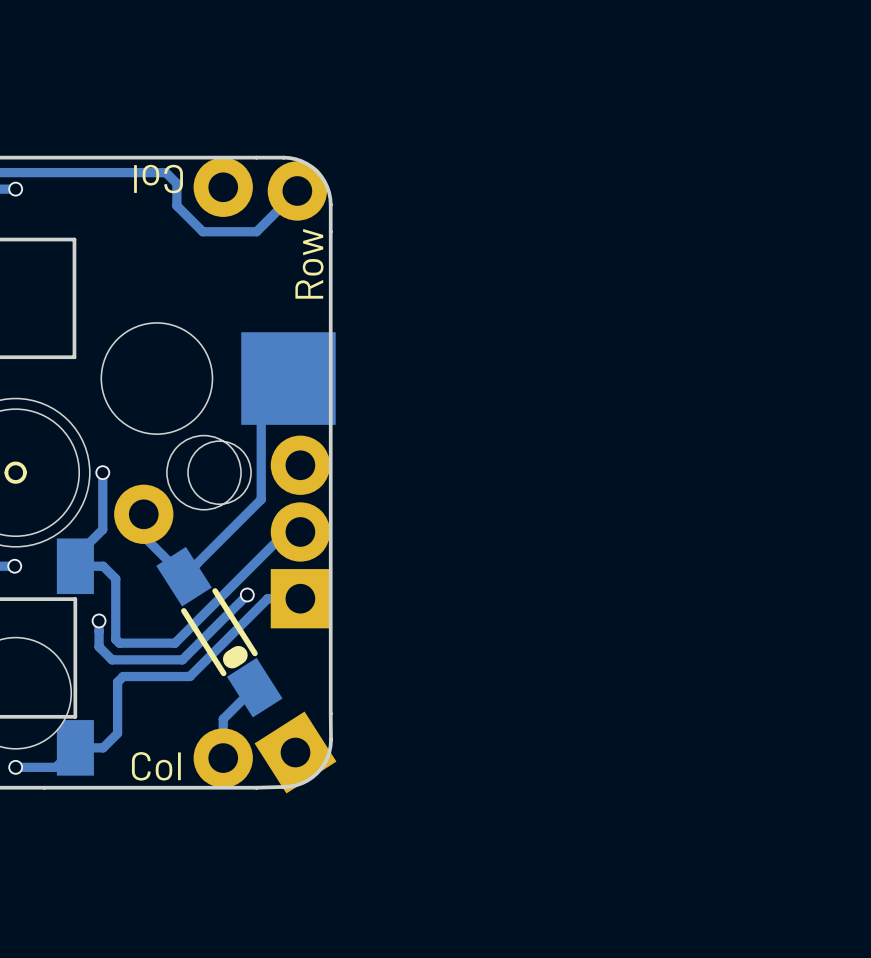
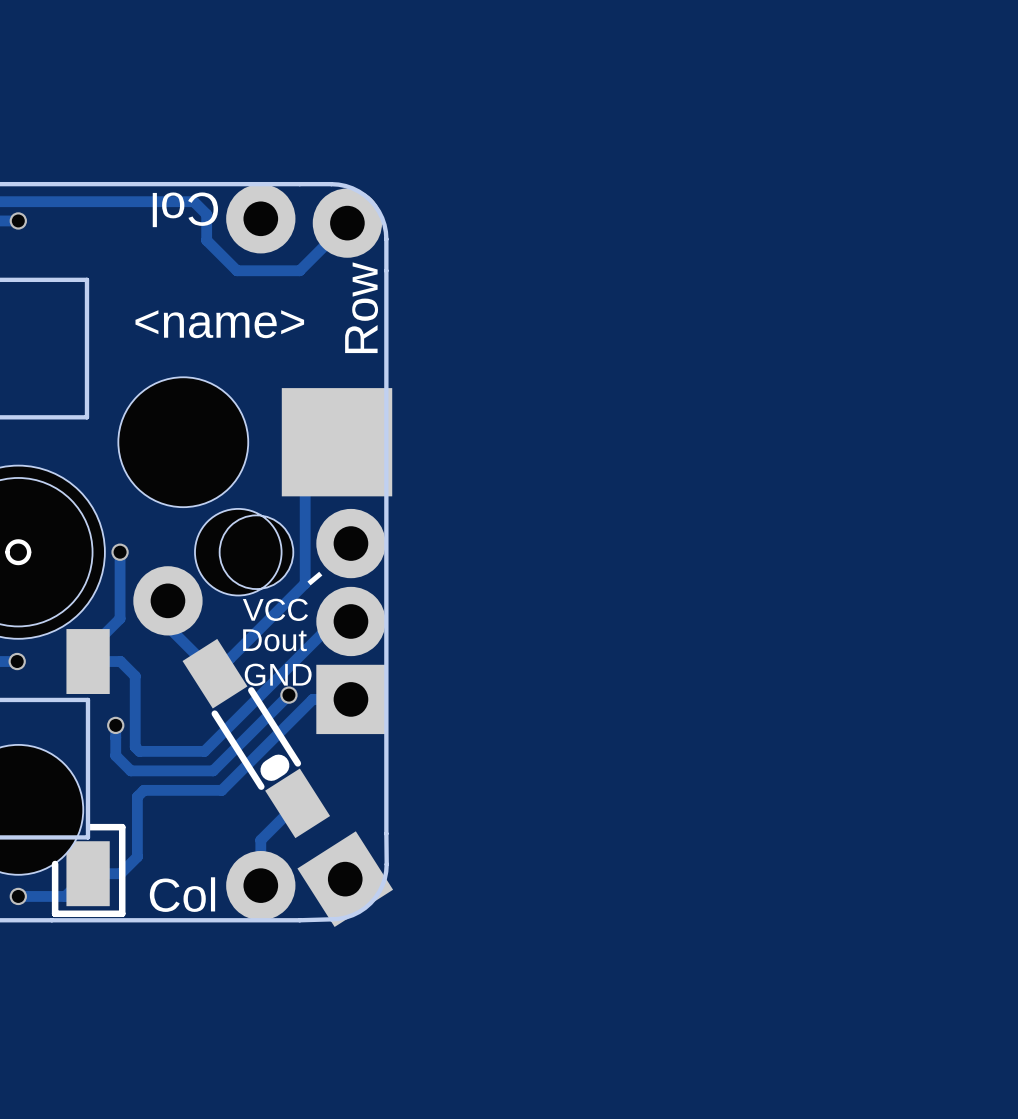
text: none -> <name> (219, 324)
text: none -> - (314, 578)
text: none -> VCC (275, 609)
text: none -> Dout (274, 640)
text: none -> GND (278, 674)
line: none -> (89, 827) (122, 827) (122, 913) (55, 913) (55, 863)

